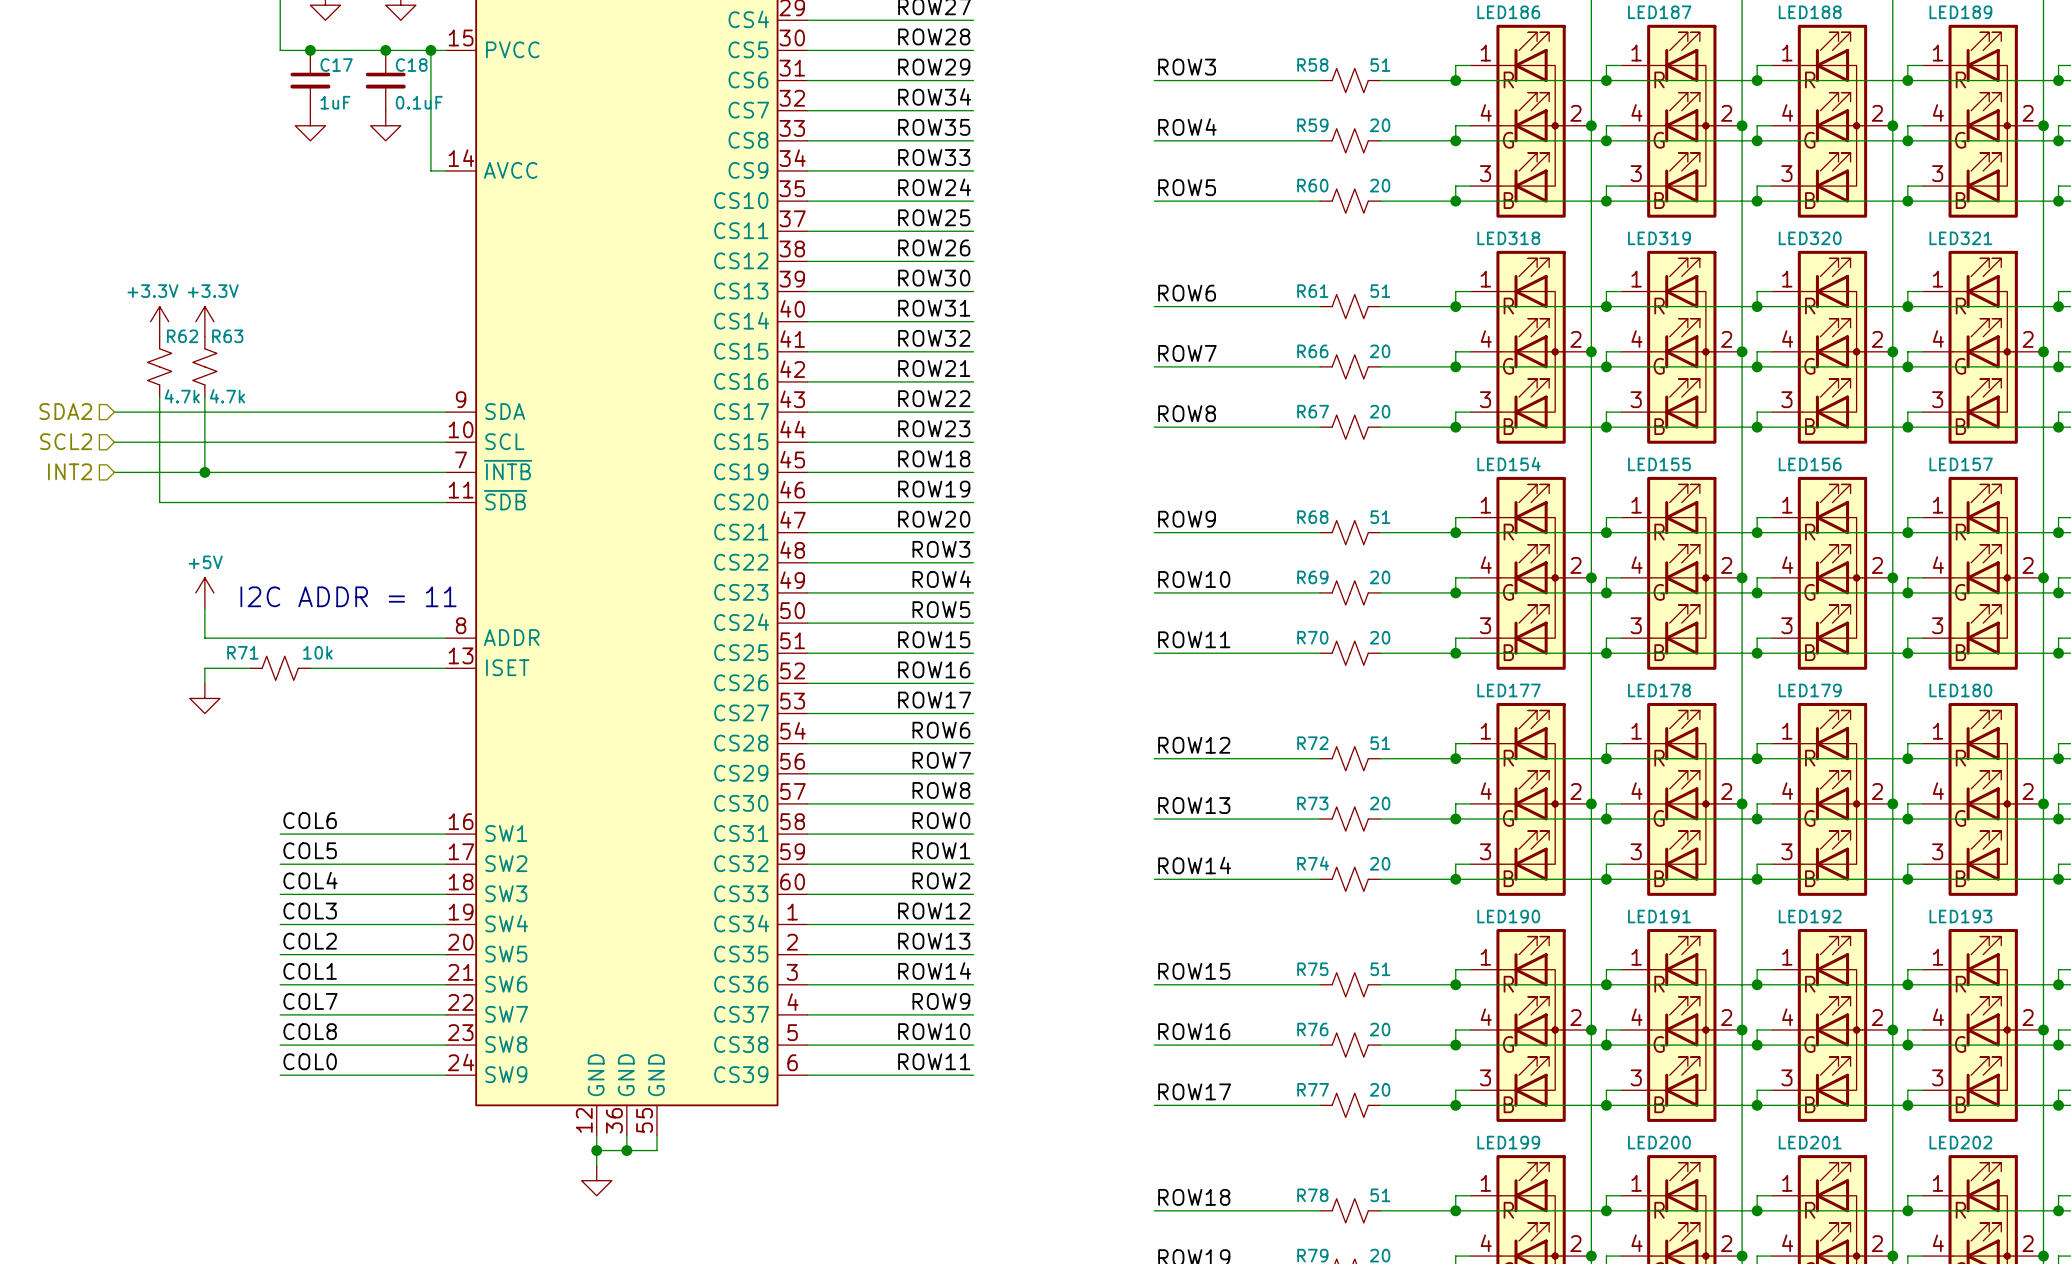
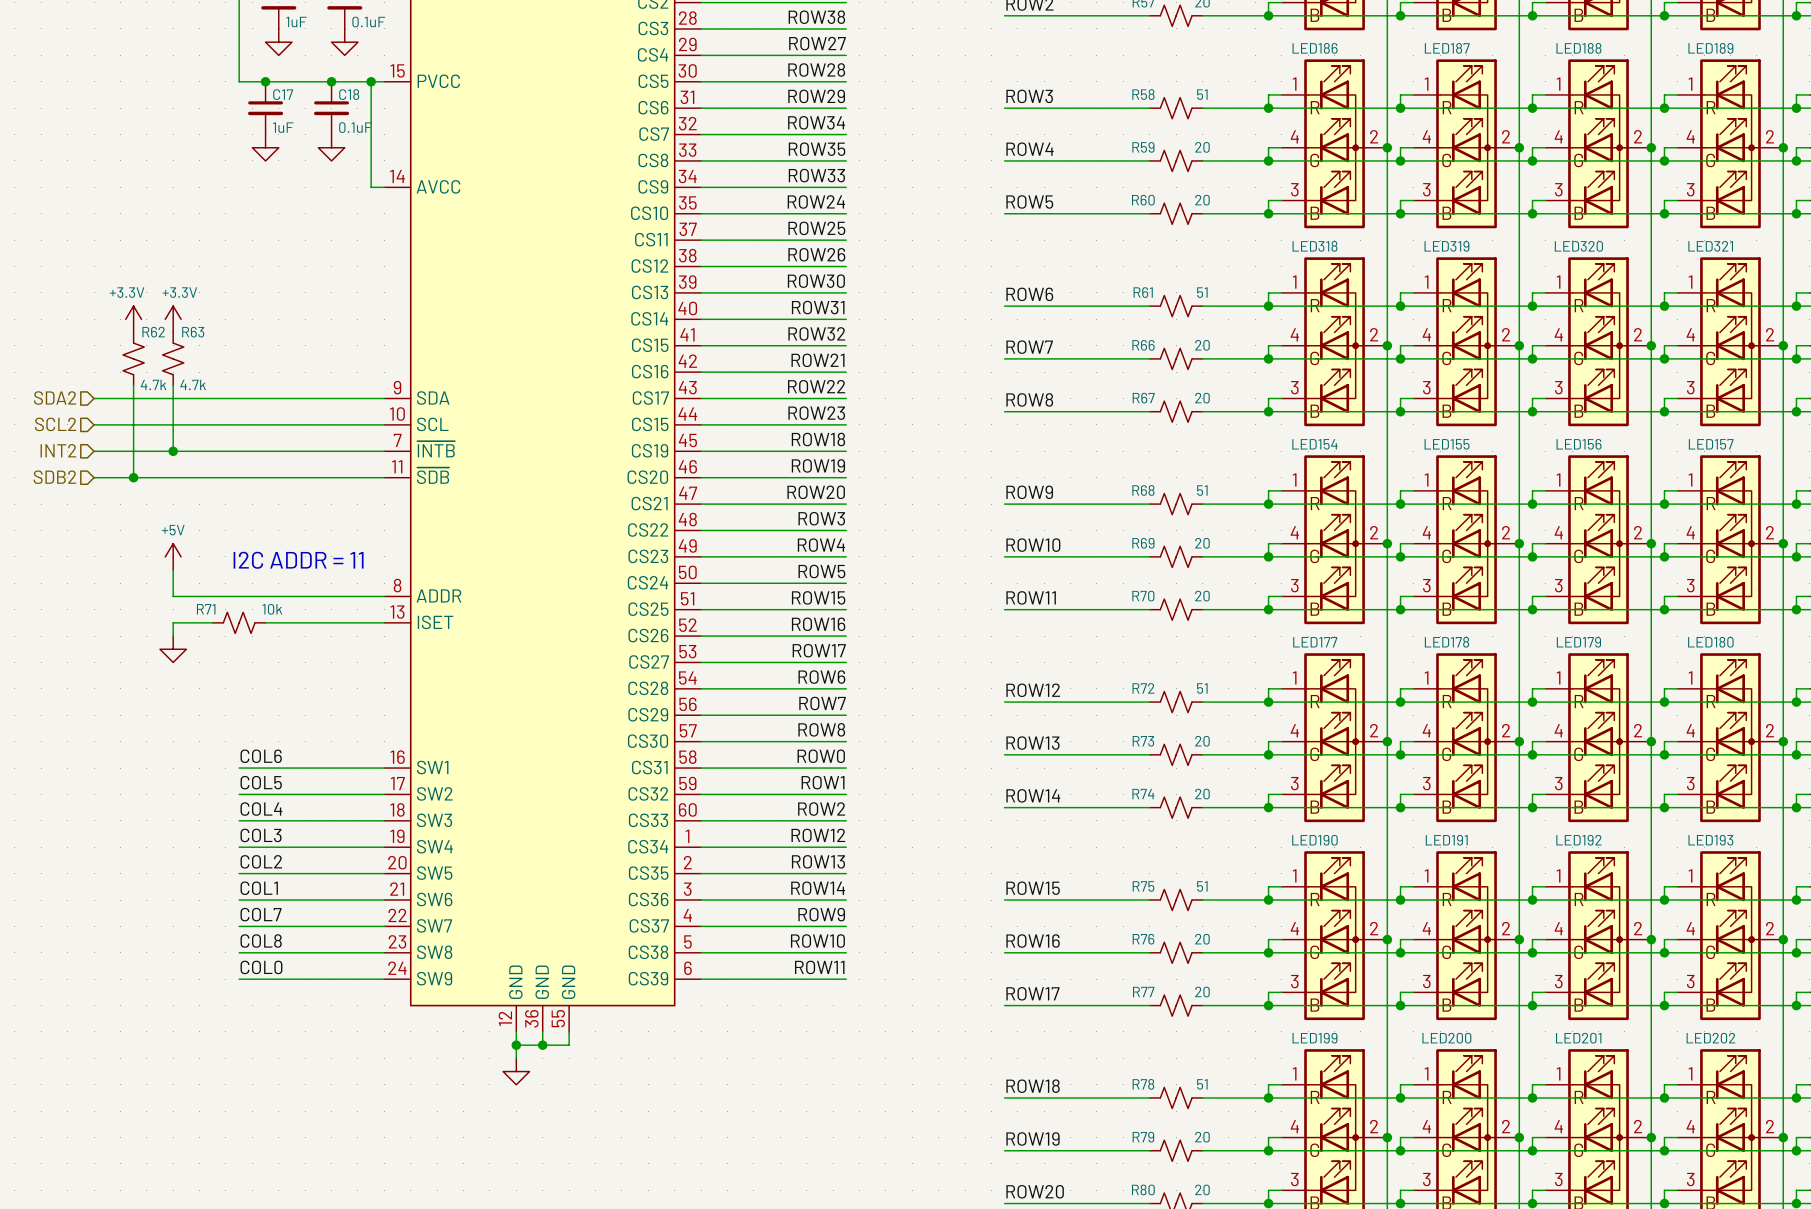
hierarchical label: none -> SDB2 (54, 477)
wire: none -> (94, 477) (133, 477)
junction: none -> (133, 477)

